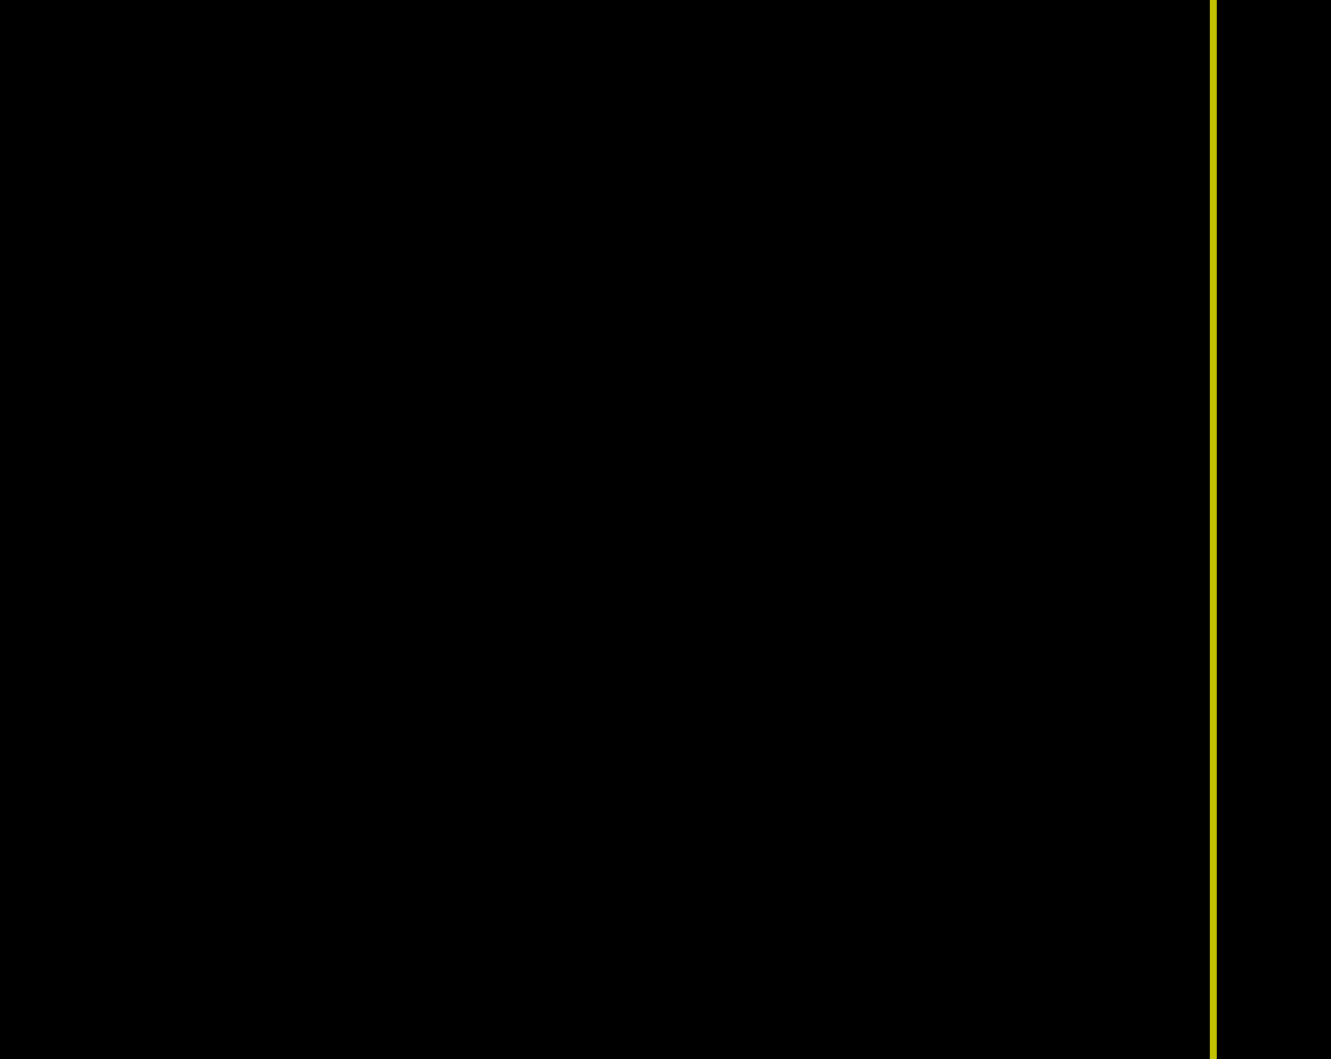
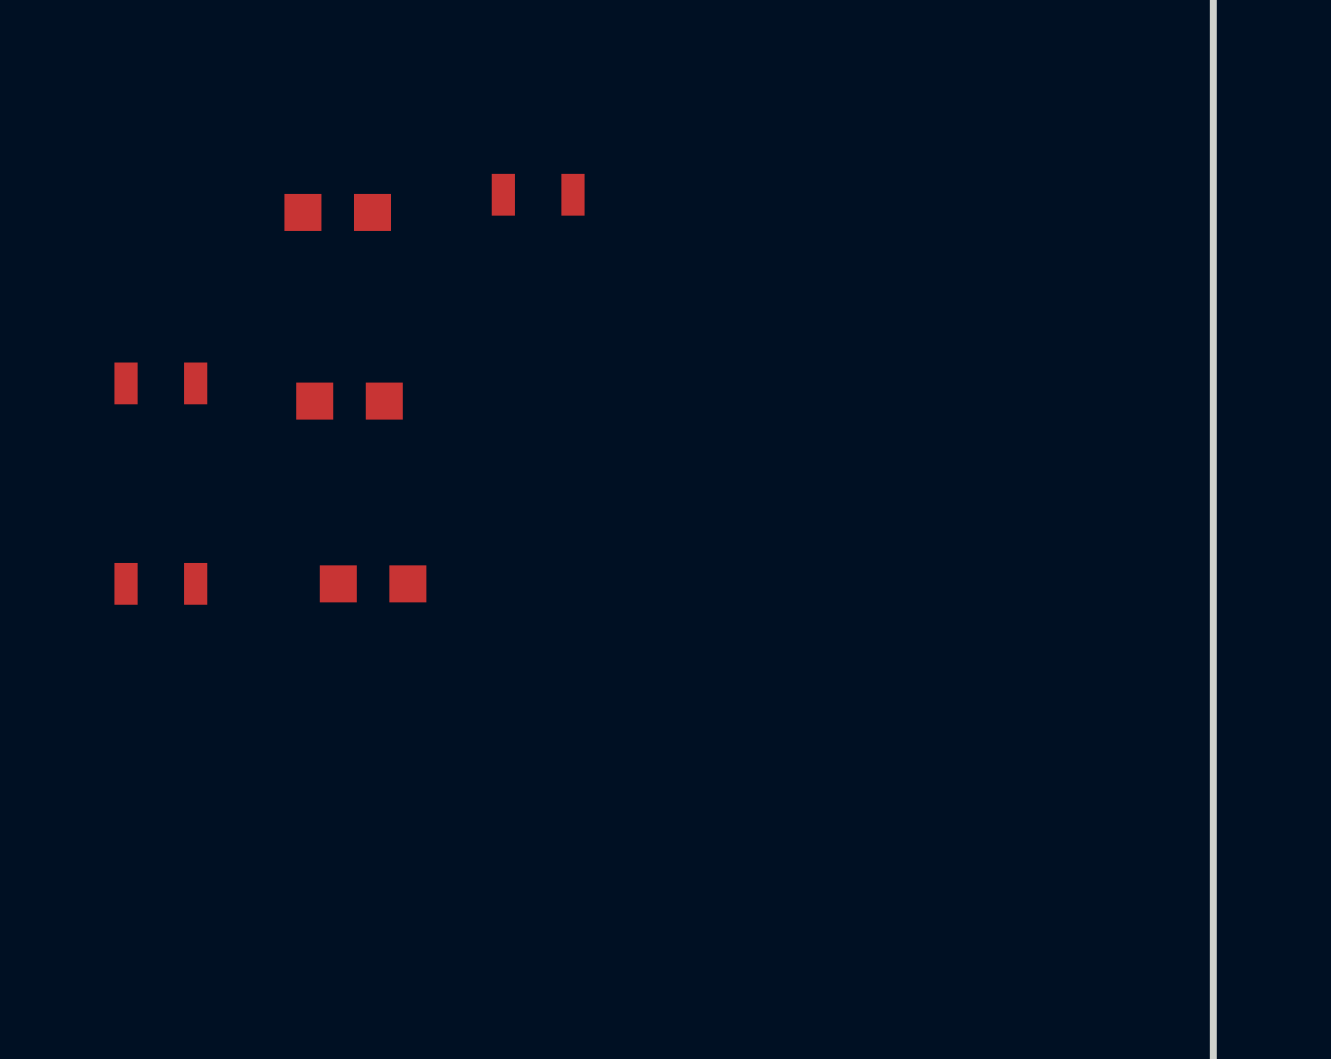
part: none -> (538, 194)
part: none -> (337, 212)
part: none -> (160, 383)
part: none -> (349, 401)
part: none -> (160, 583)
part: none -> (373, 583)

